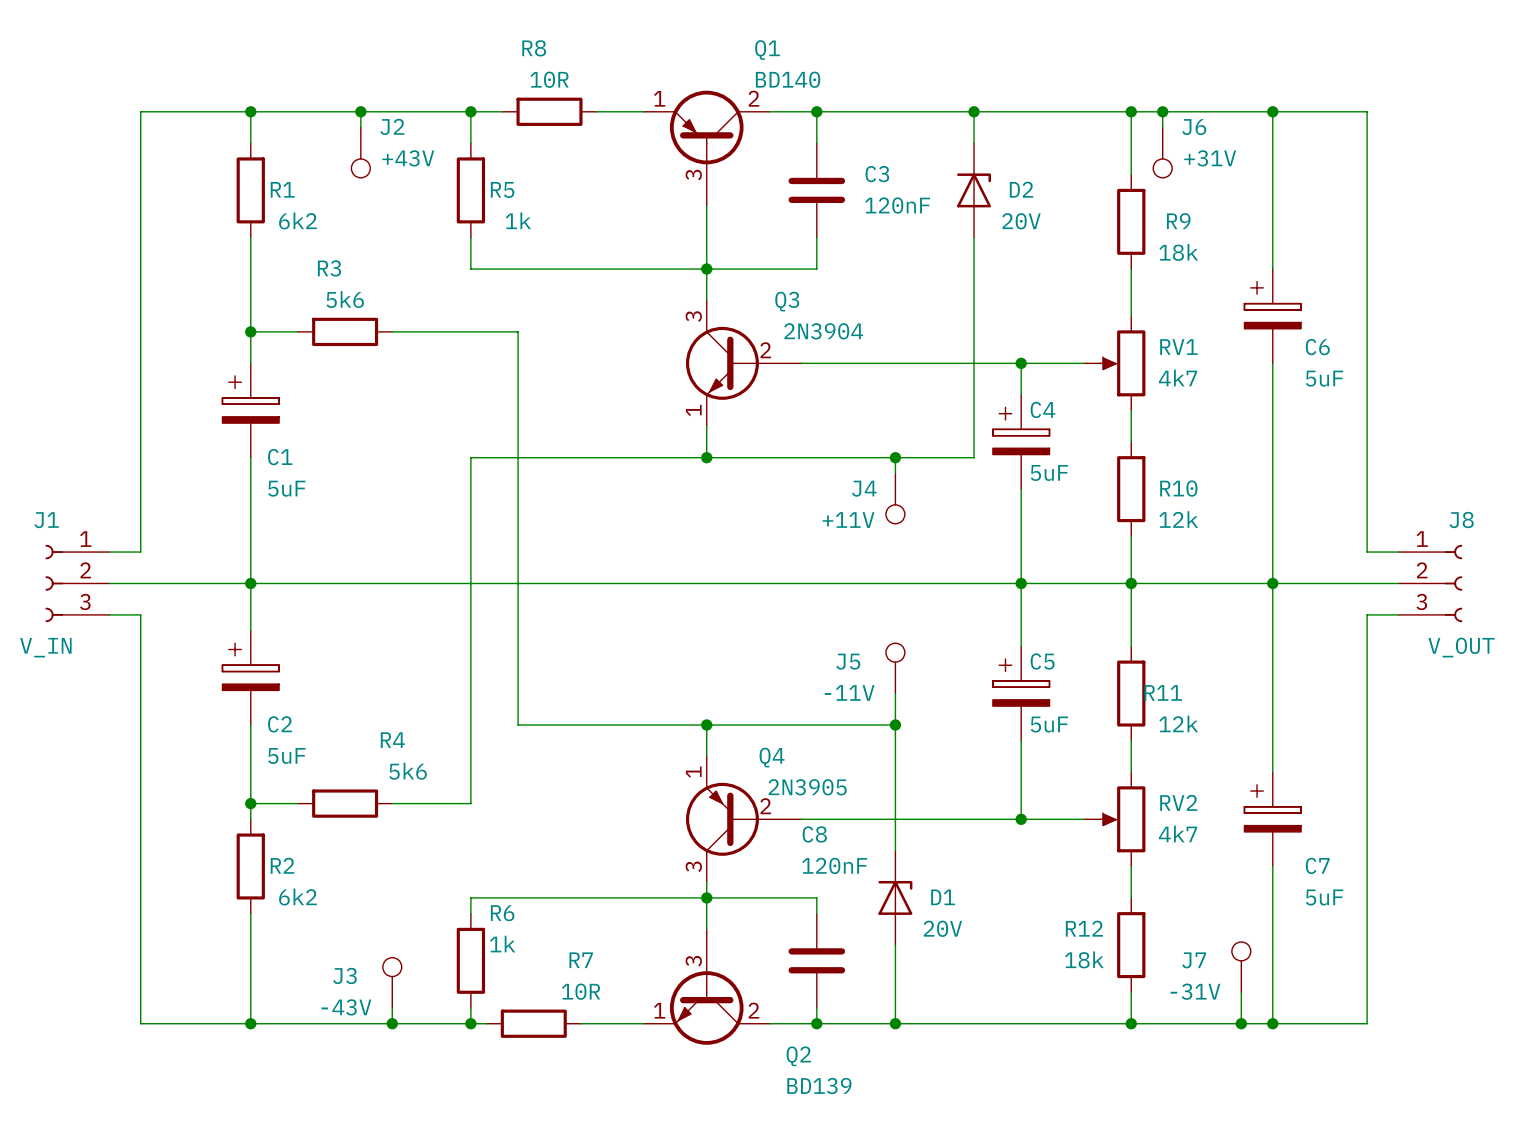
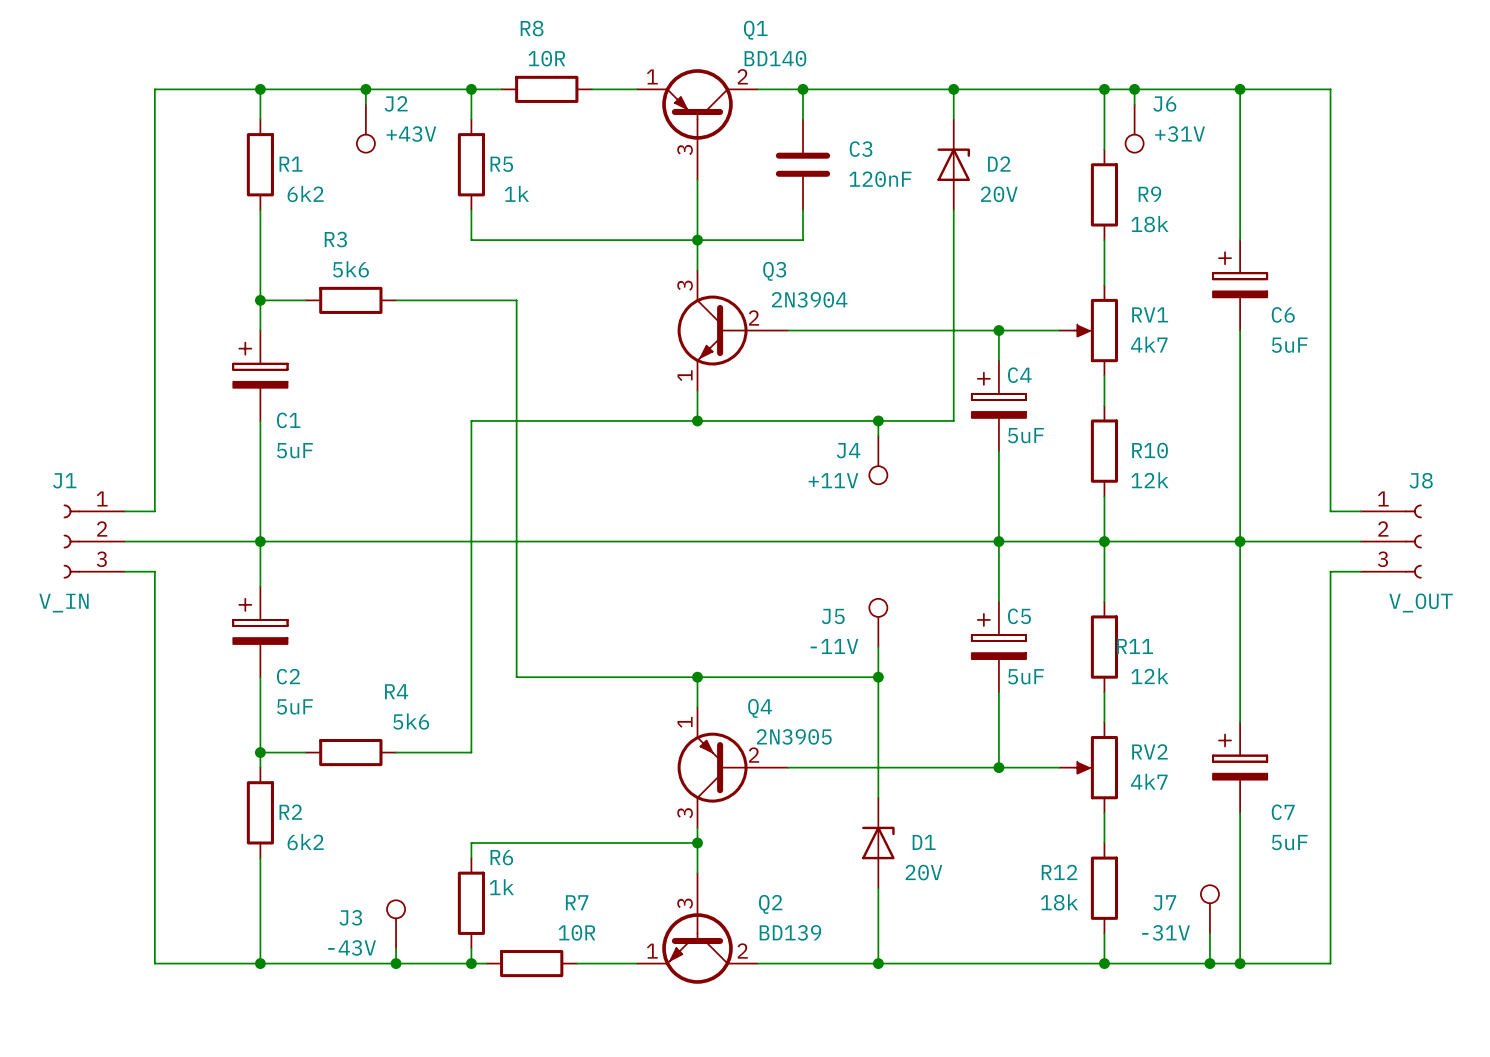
wire: (706, 897) (816, 897) (816, 913) -> none
C8: 120nF (816, 960) -> none
wire: (816, 1008) (816, 1023) -> none
junction: (816, 1023) -> none
Q2 name position: Q2 (798, 1056) -> Q2 (770, 904)
Q2 value position: BD139 (819, 1086) -> BD139 (790, 932)

